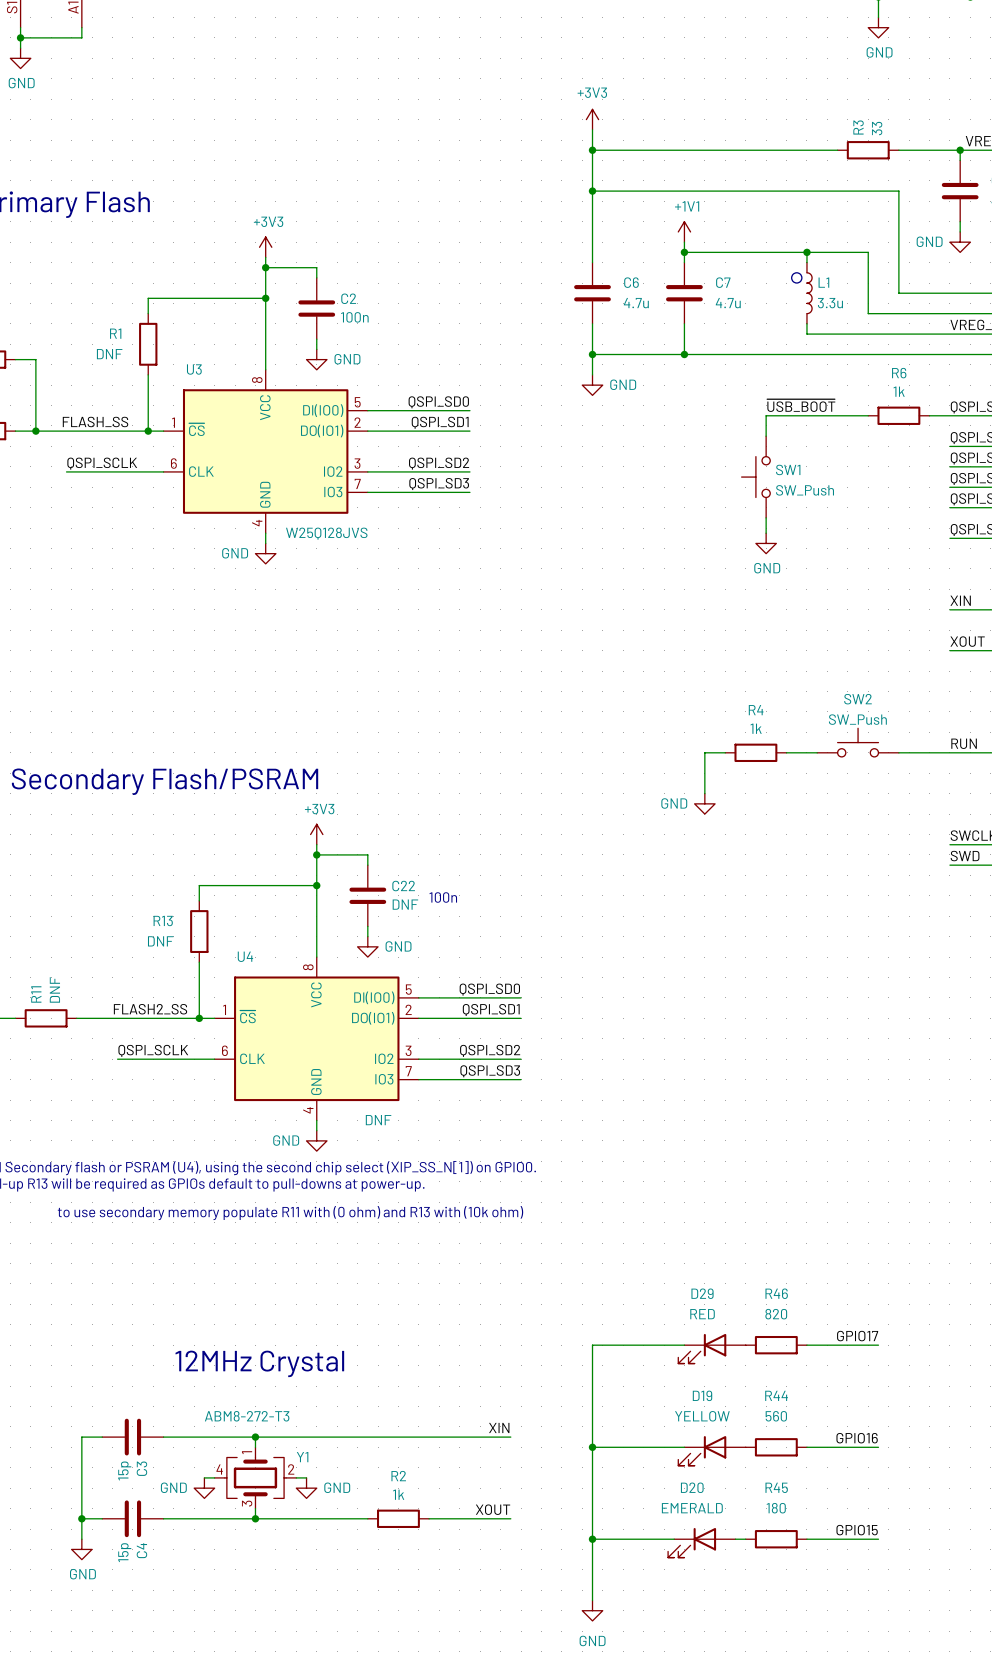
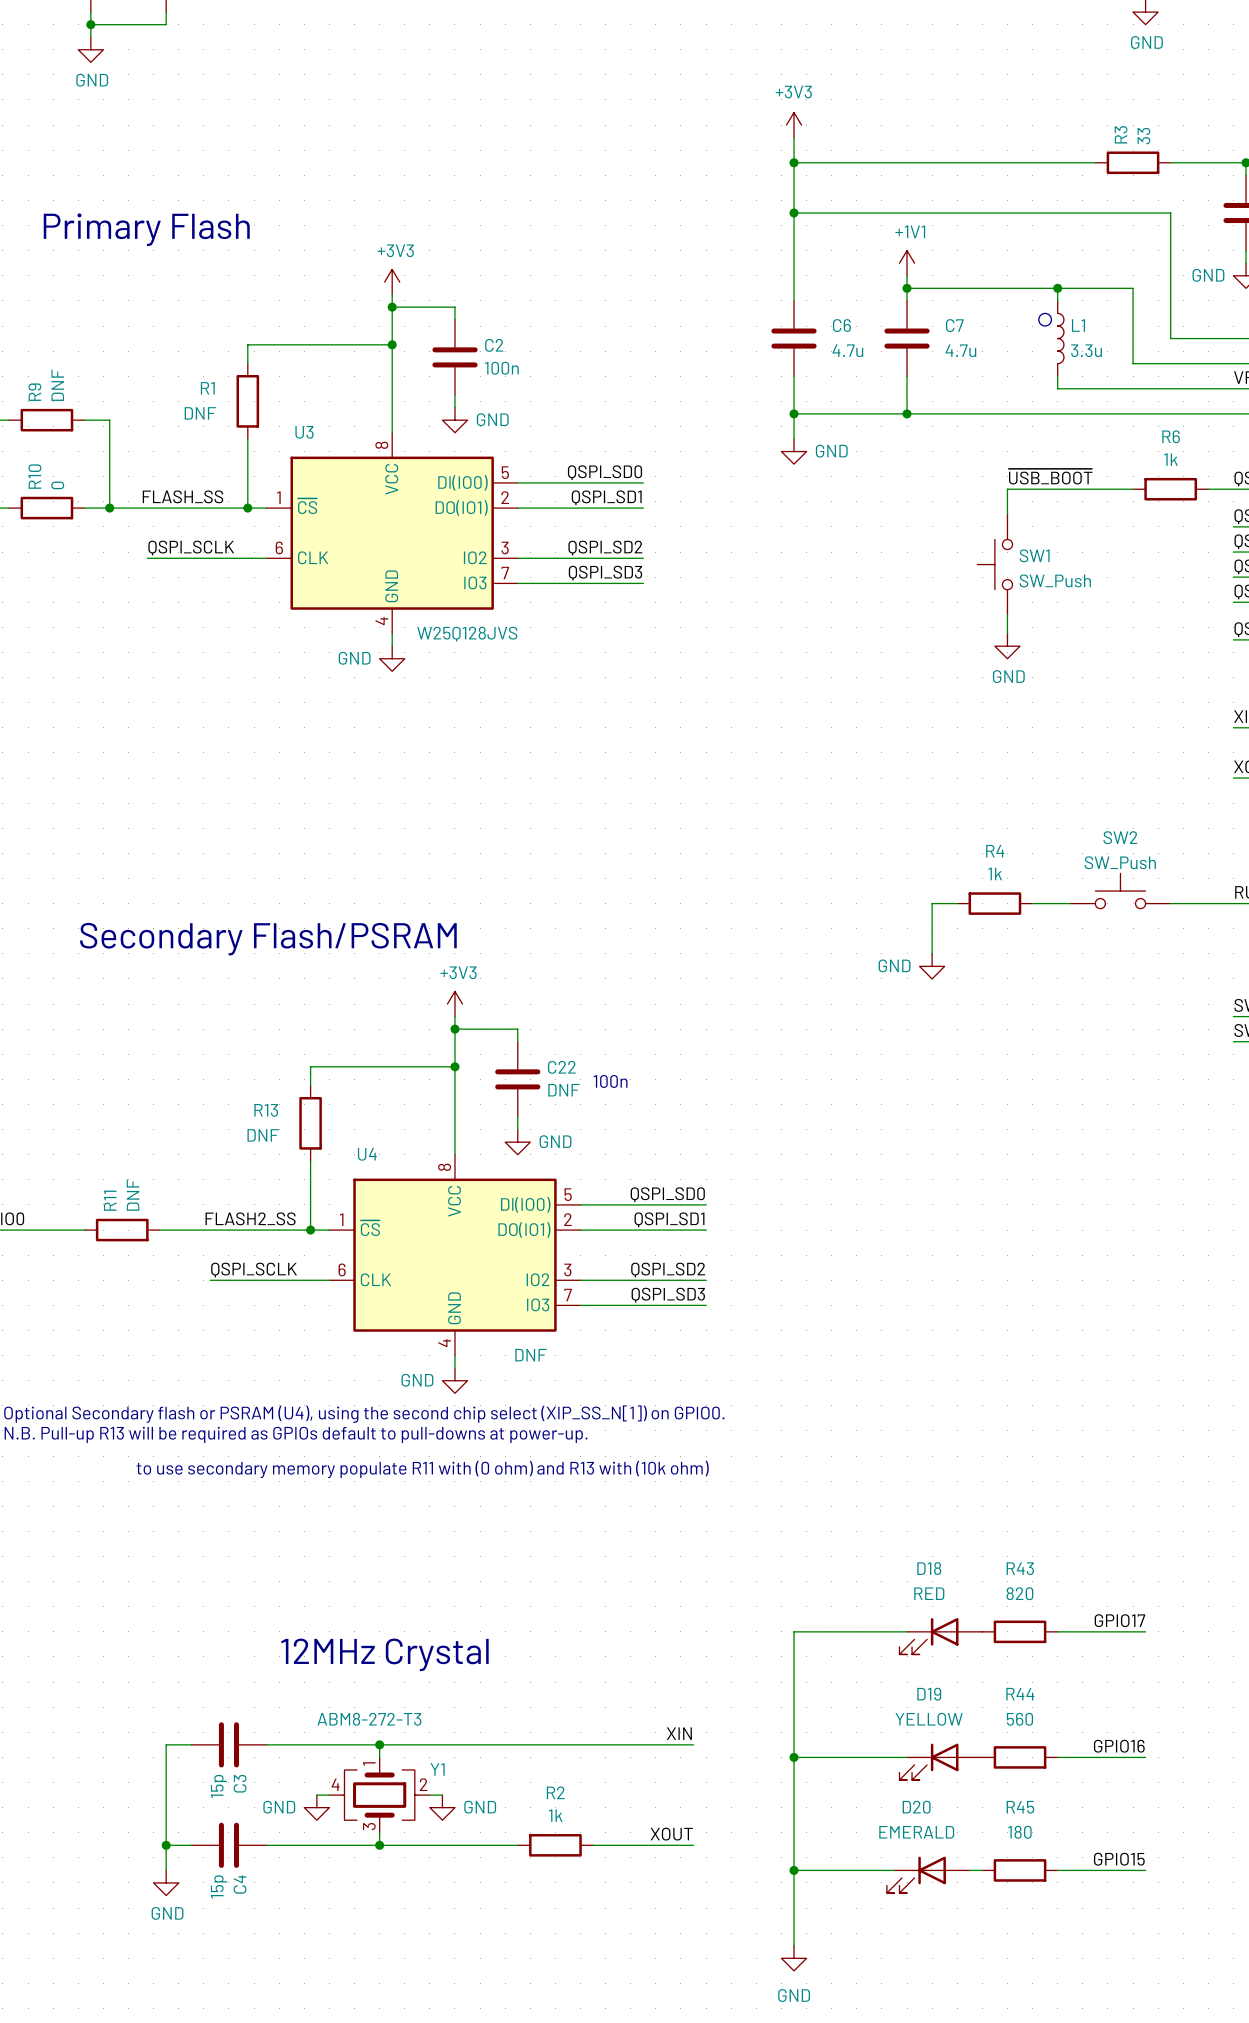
D29 name: D29 (702, 1293) -> D18 (929, 1568)
R46 name: R46 (776, 1293) -> R43 (1020, 1568)

